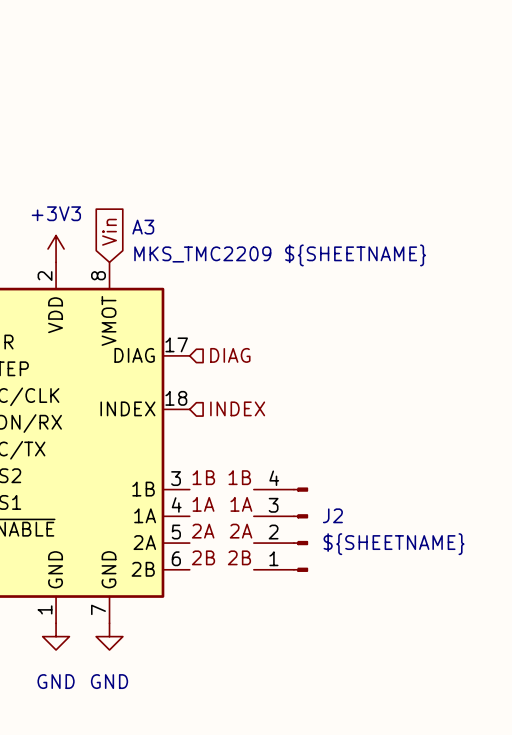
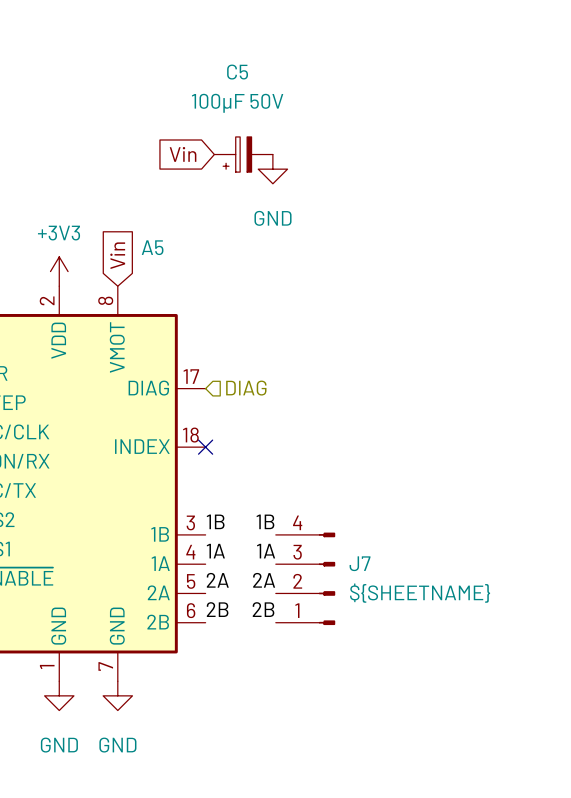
global label: none -> Vin (183, 154)
C5: none -> 100µF 50V (243, 154)
power symbol: none -> GND (272, 169)
A3 name: A3 (143, 227) -> A5 (152, 247)
A3 value: MKS_TMC2209 ${SHEETNAME} (280, 255) -> none
hierarchical label: INDEX (237, 408) -> none
no-connect mark: none -> (205, 447)
J2 name: J2 (332, 515) -> J7 (360, 563)

